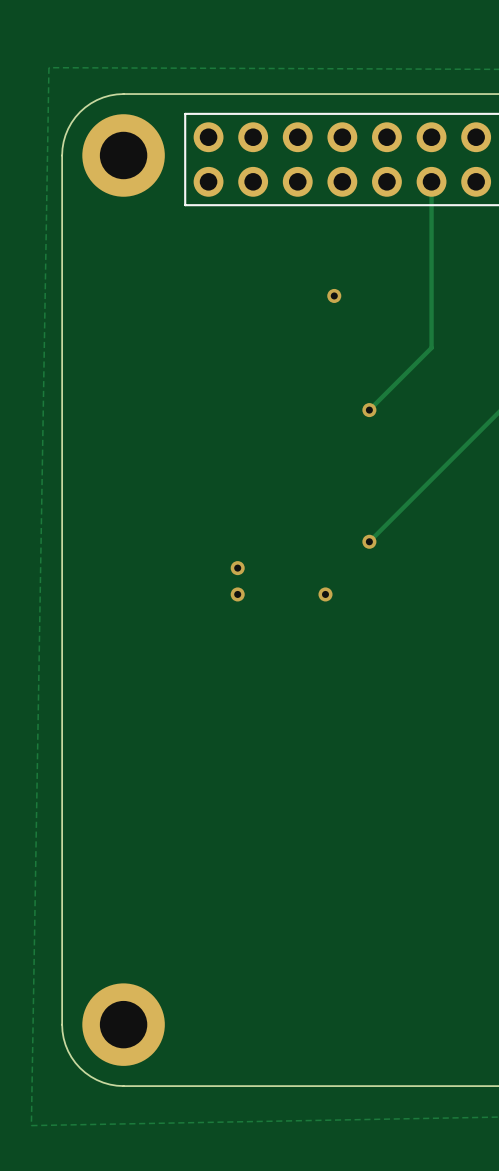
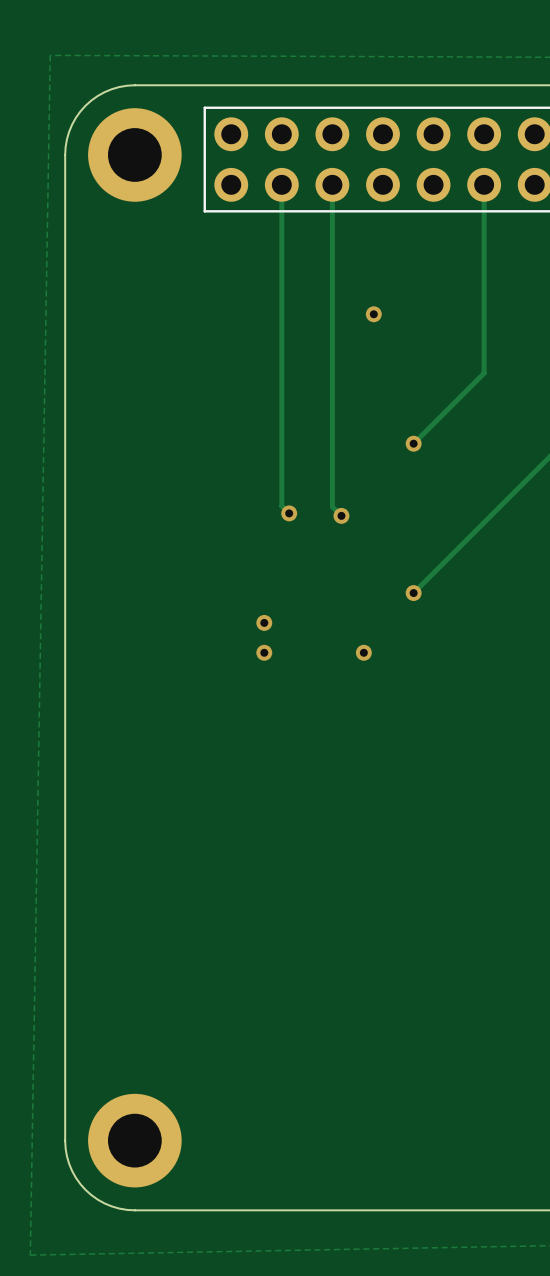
track: none -> (281, 184) (281, 506) (289, 513)
track: none -> (332, 184) (332, 506) (343, 518)
via: none -> (289, 513)
via: none -> (341, 515)

